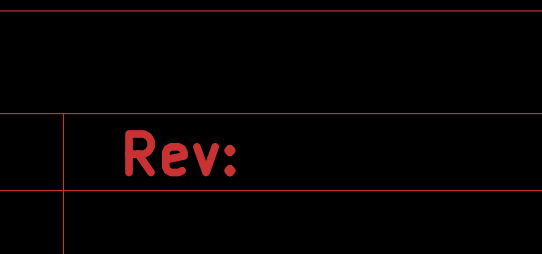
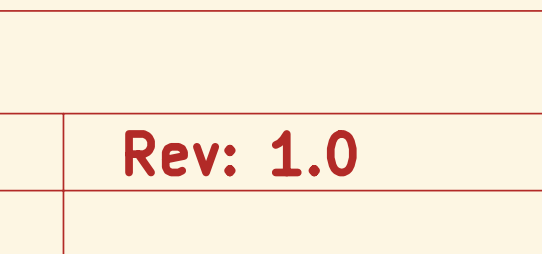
title block: Rev: (180, 153) -> Rev: 1.0 (240, 153)

